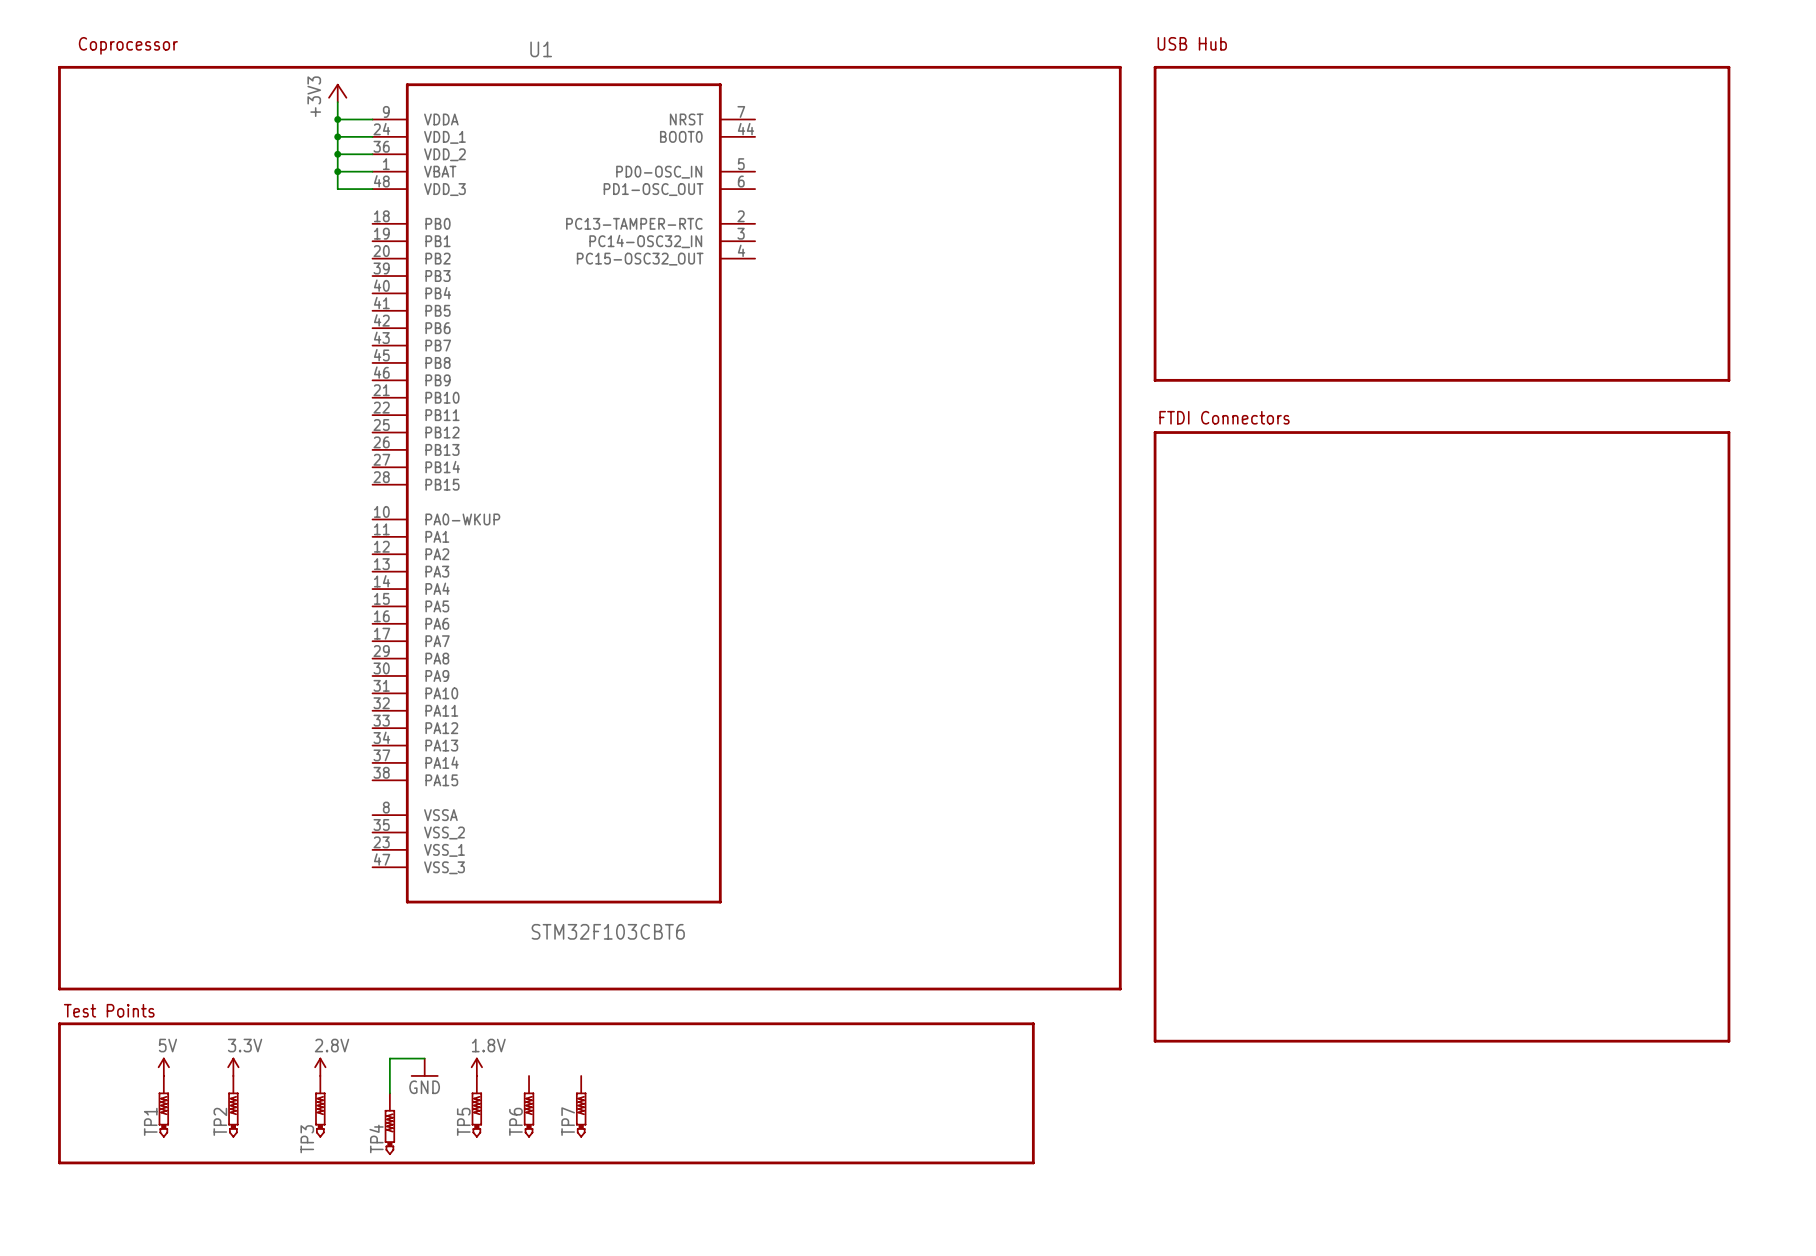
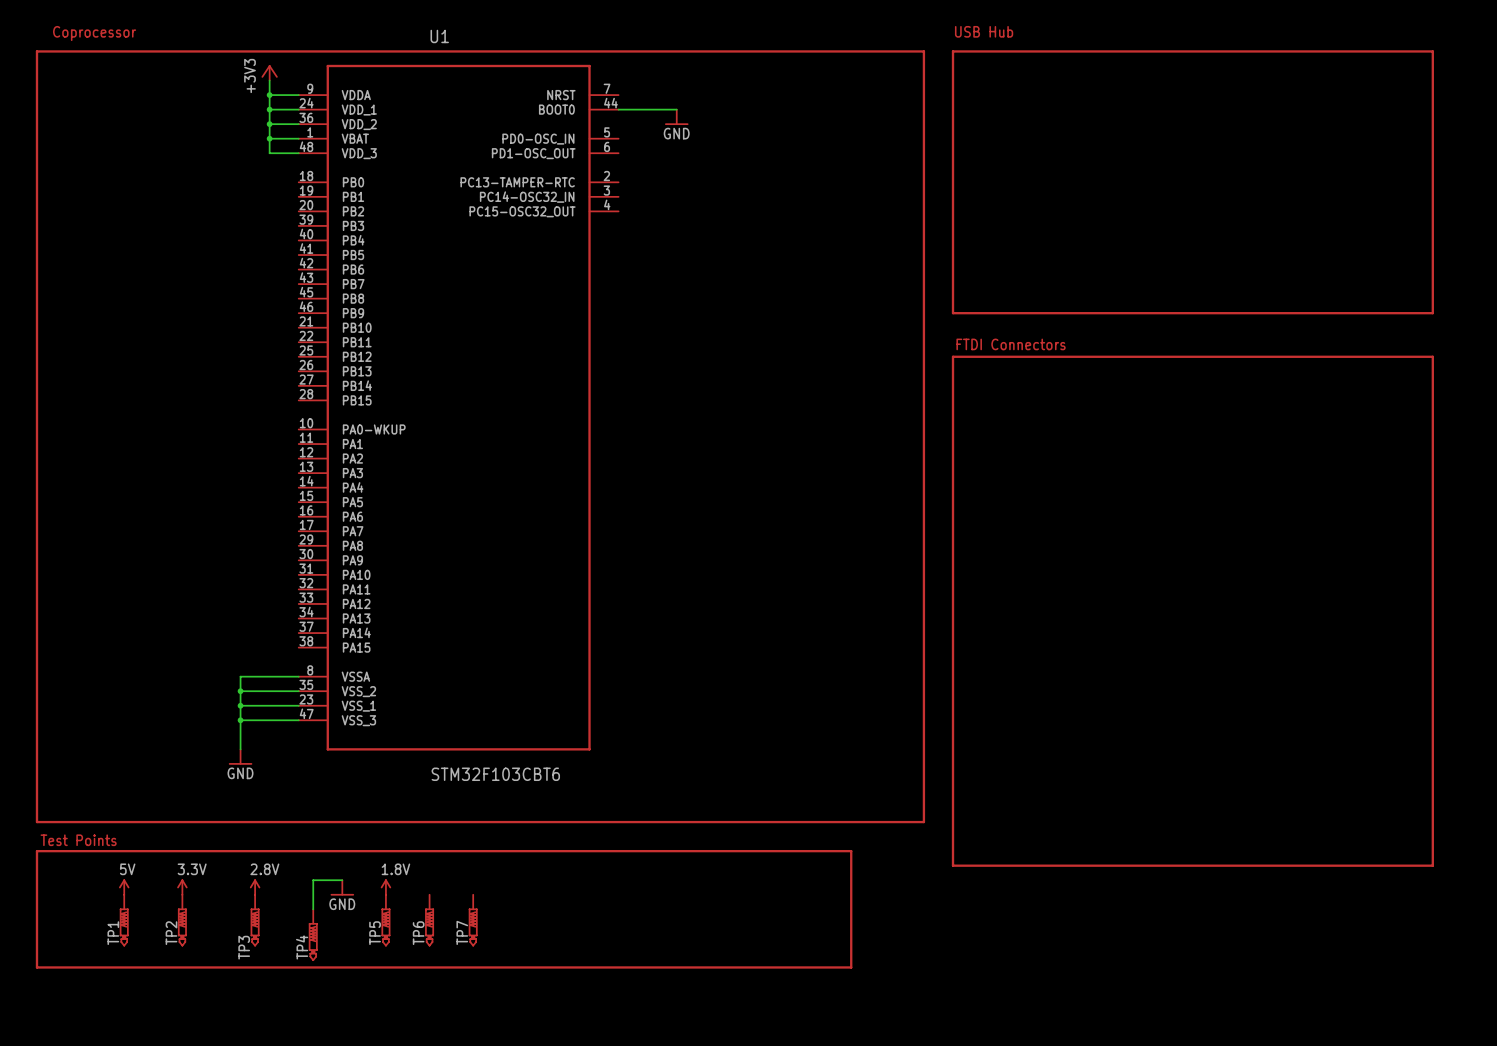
wire: none -> (618, 109) (676, 109)
power symbol: none -> GND (676, 117)
wire: none -> (298, 676) (240, 676) (240, 749)
wire: none -> (240, 691) (298, 691)
junction: none -> (240, 691)
wire: none -> (240, 705) (298, 705)
junction: none -> (240, 705)
wire: none -> (240, 720) (298, 720)
junction: none -> (240, 720)
power symbol: none -> GND (240, 757)

